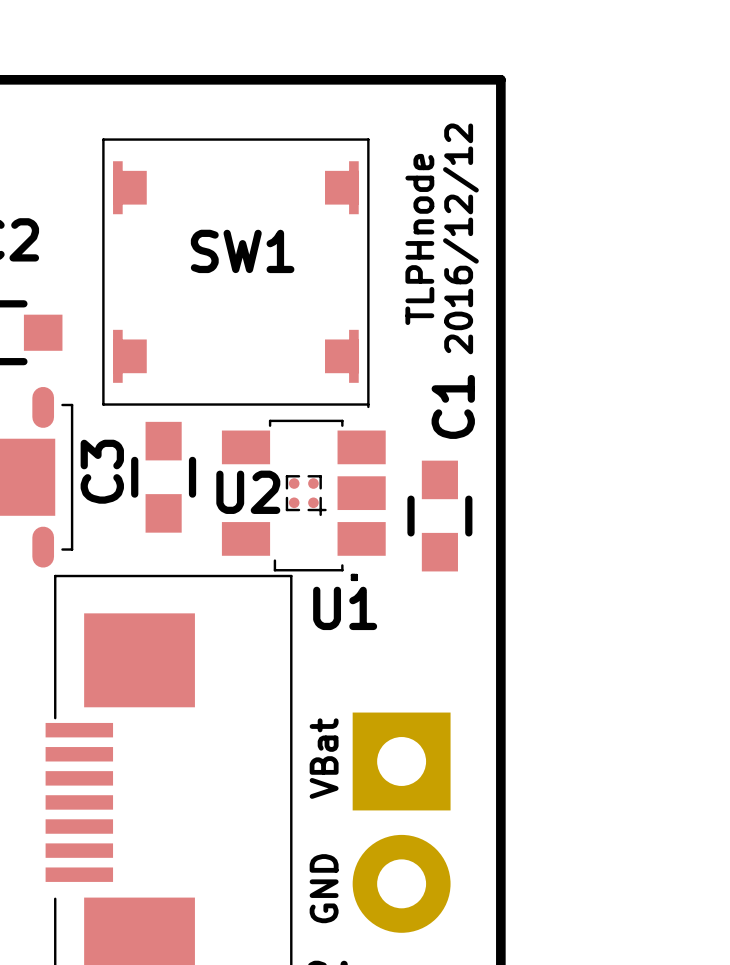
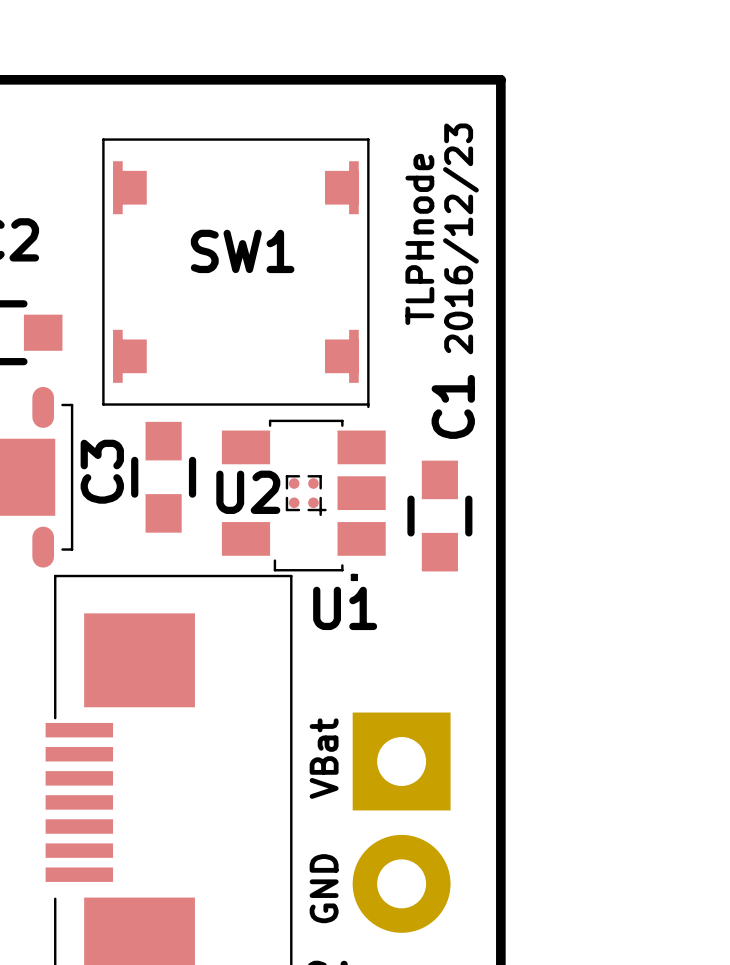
text: 2016/12/12 (460, 238) -> 2016/12/23 (460, 238)

